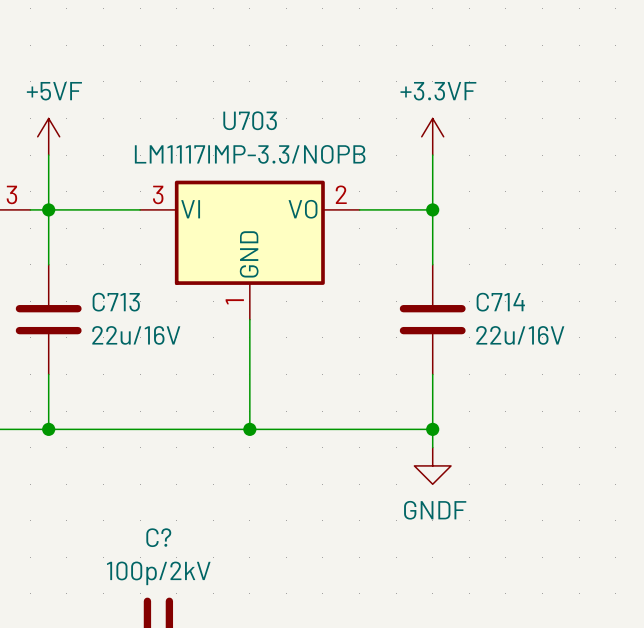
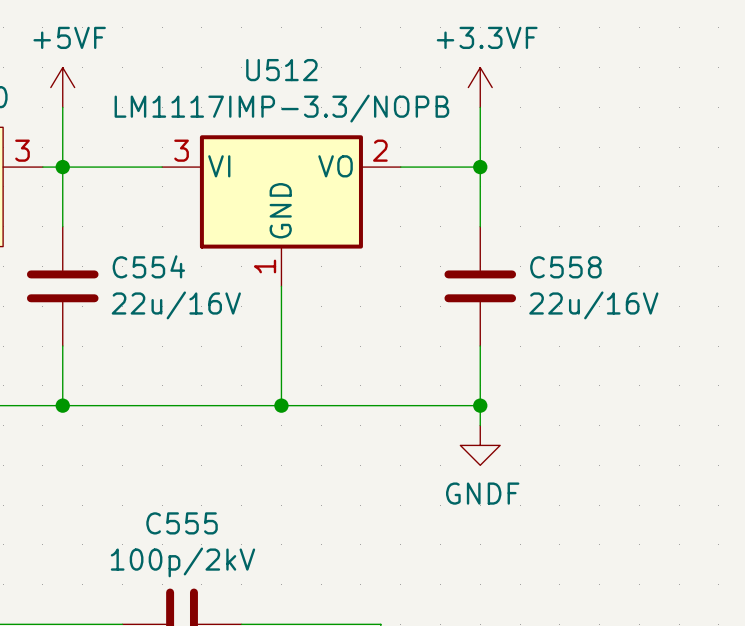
U703 name: U703 (250, 120) -> U512 (281, 70)
C713 name: C713 (116, 302) -> C554 (148, 266)
C714 name: C714 (500, 302) -> C558 (565, 267)
C? name: C? (158, 537) -> C555 (182, 523)

